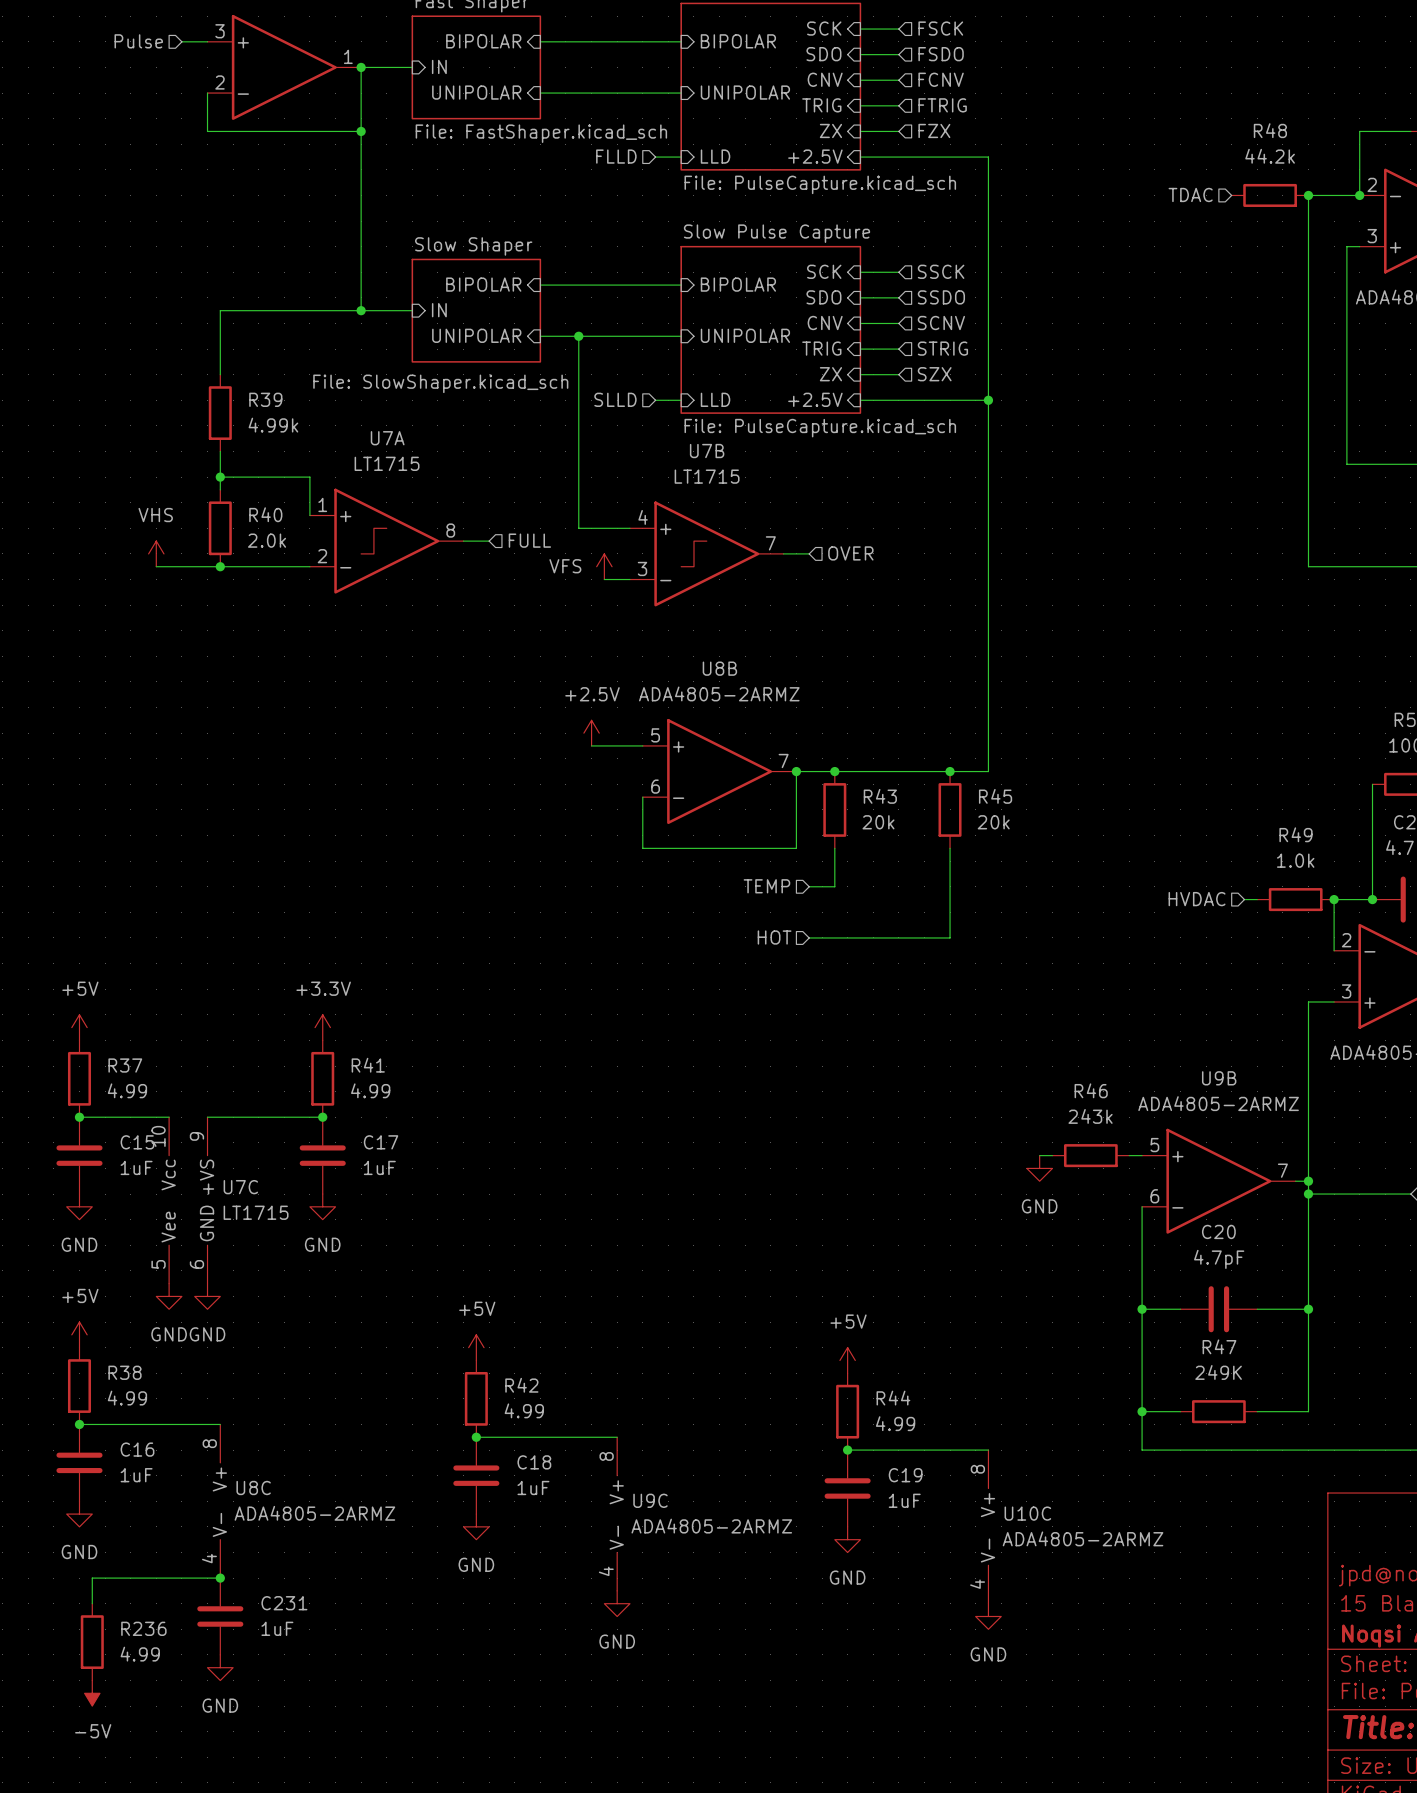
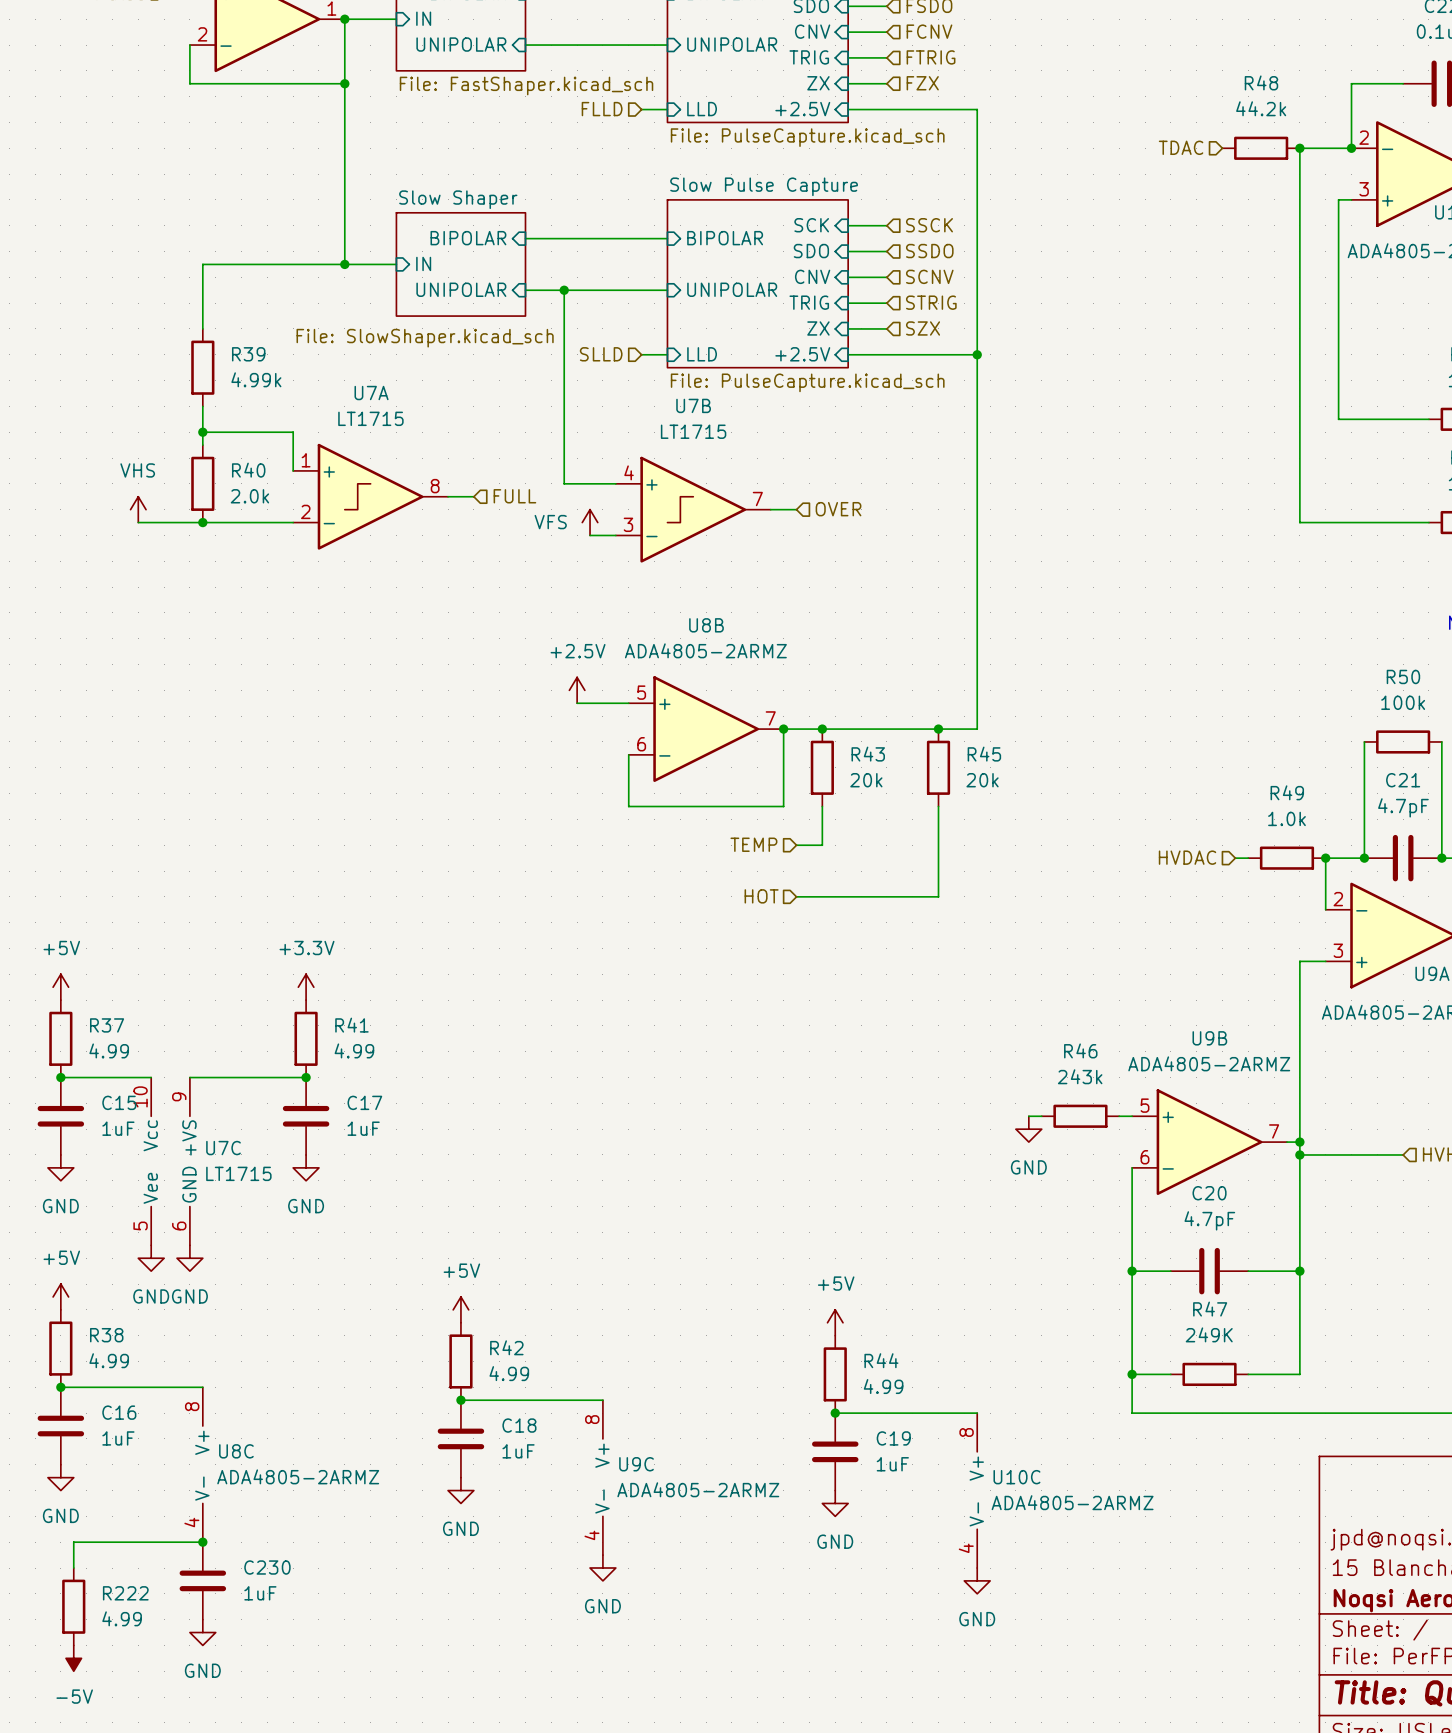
C231 name: C231 (284, 1603) -> C230 (267, 1567)
R236 name: R236 (143, 1628) -> R222 (125, 1593)

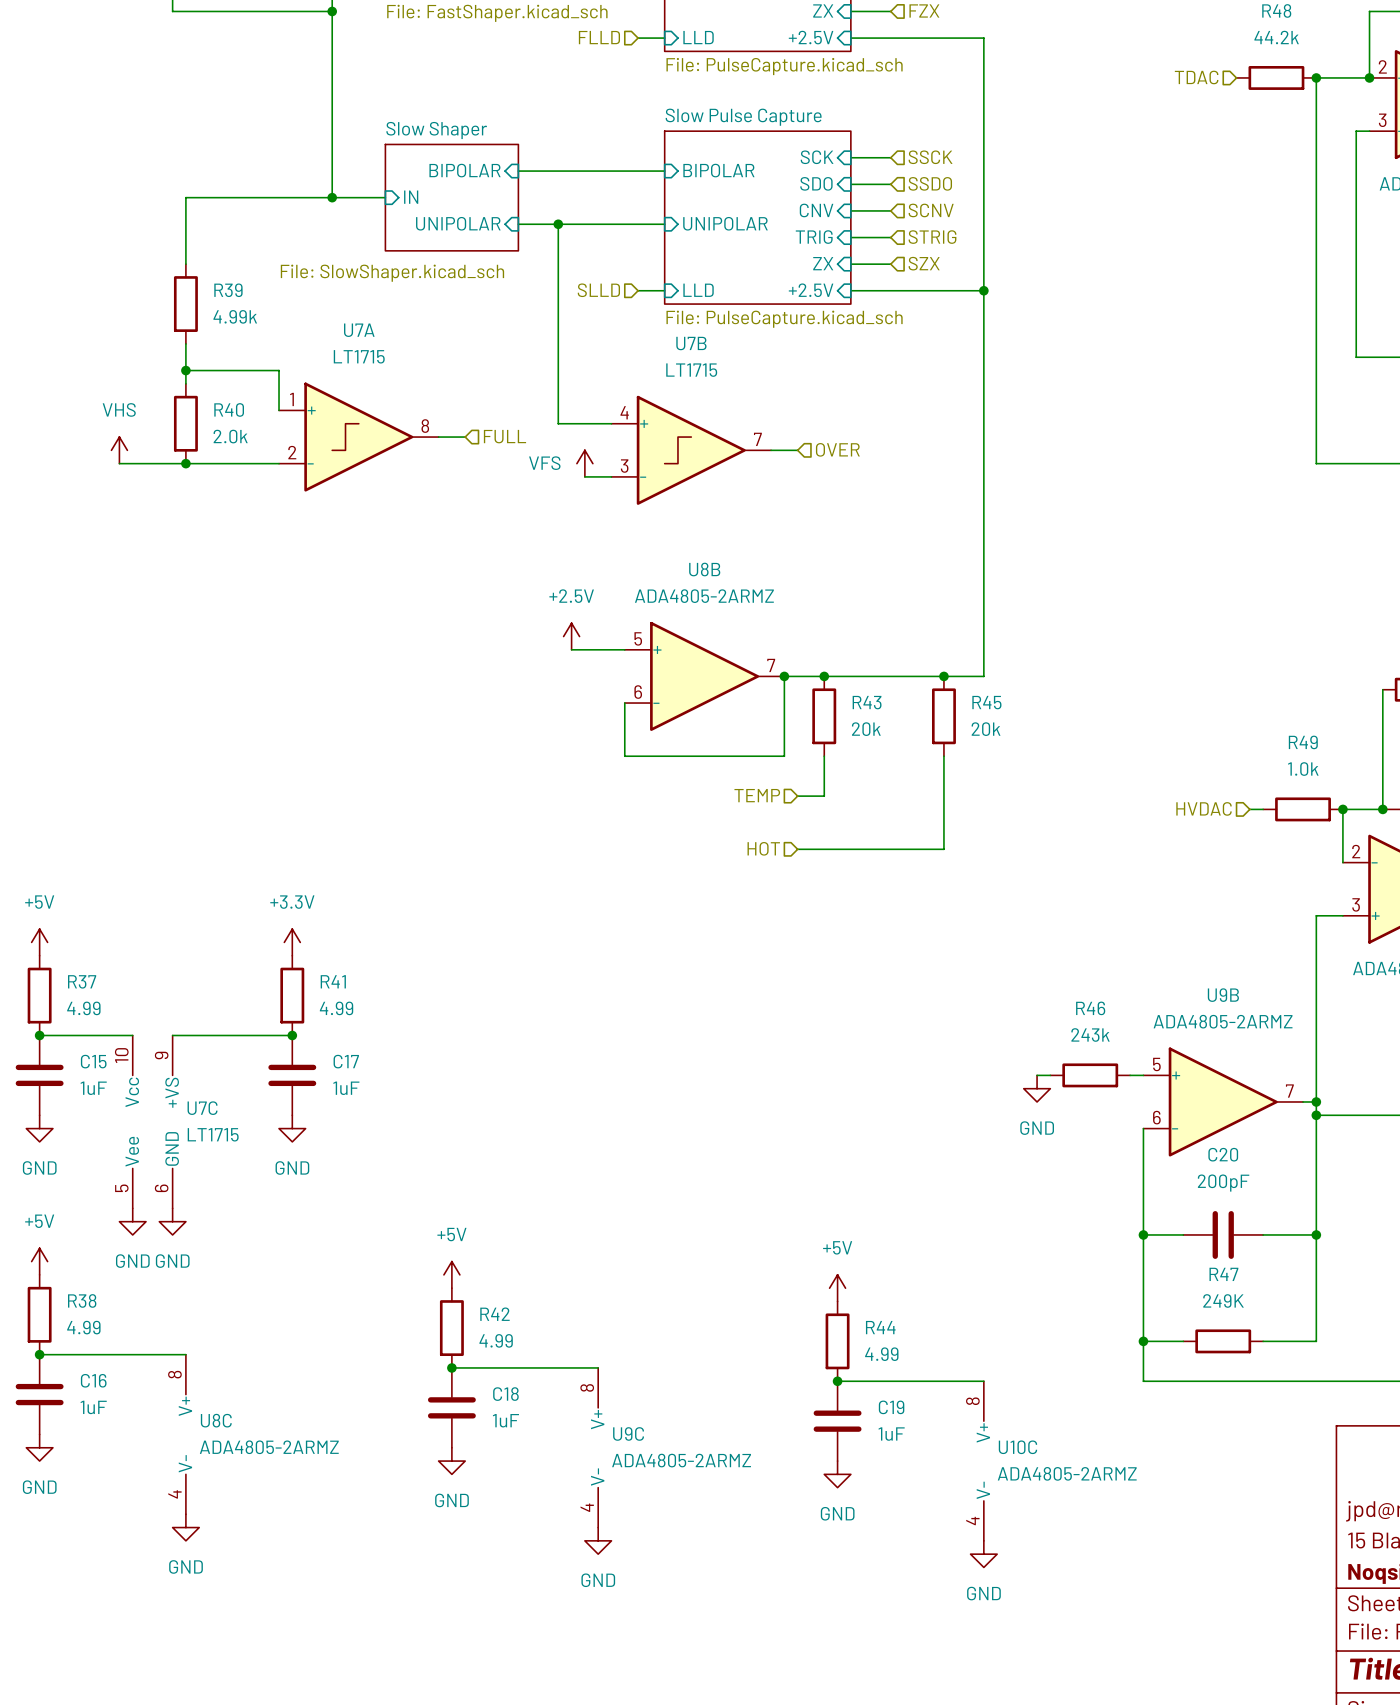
C20 value: 4.7pF (1209, 1220) -> 200pF (1223, 1183)
wire: (202, 1542) (73, 1542) (73, 1568) -> none
junction: (202, 1542) -> none
C230: 1uF (202, 1580) -> none
R222: 4.99 (73, 1606) -> none
power symbol position: GND (202, 1632) -> GND (185, 1527)
power symbol: -5V (73, 1658) -> none

